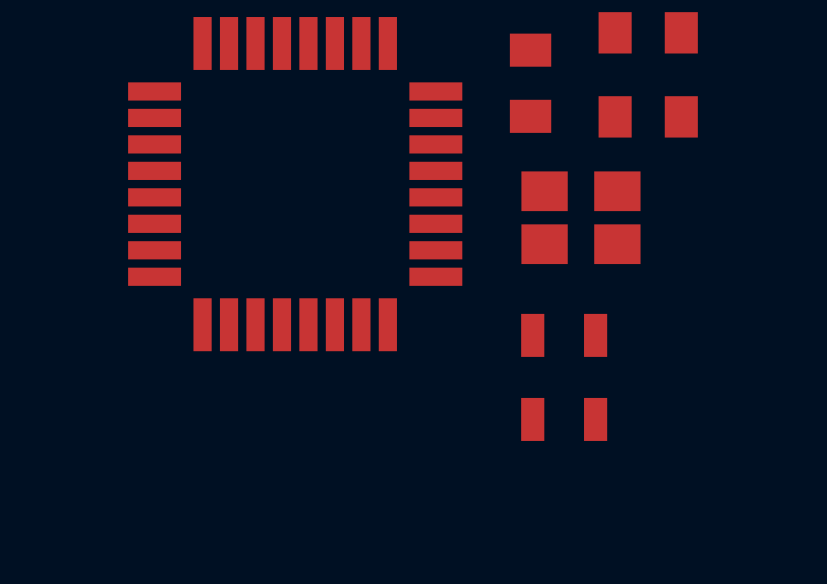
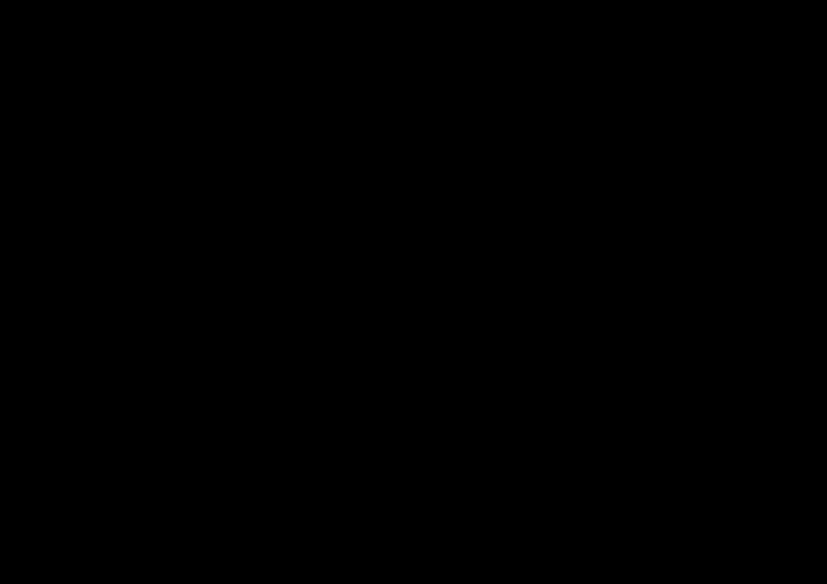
part: (648, 32) -> none
part: (530, 83) -> none
part: (648, 116) -> none
part: (295, 184) -> none
part: (580, 217) -> none
part: (564, 335) -> none
part: (564, 419) -> none

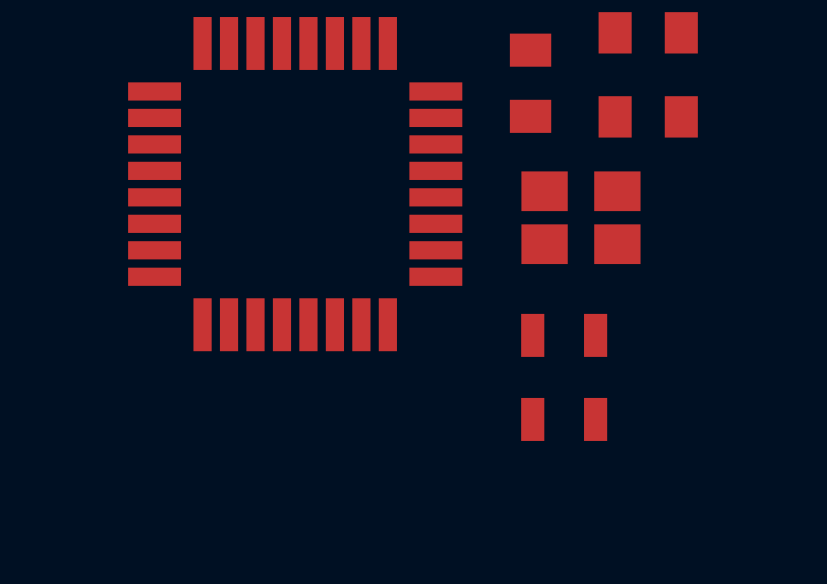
part: none -> (648, 32)
part: none -> (530, 83)
part: none -> (648, 116)
part: none -> (295, 184)
part: none -> (580, 217)
part: none -> (564, 335)
part: none -> (564, 419)

